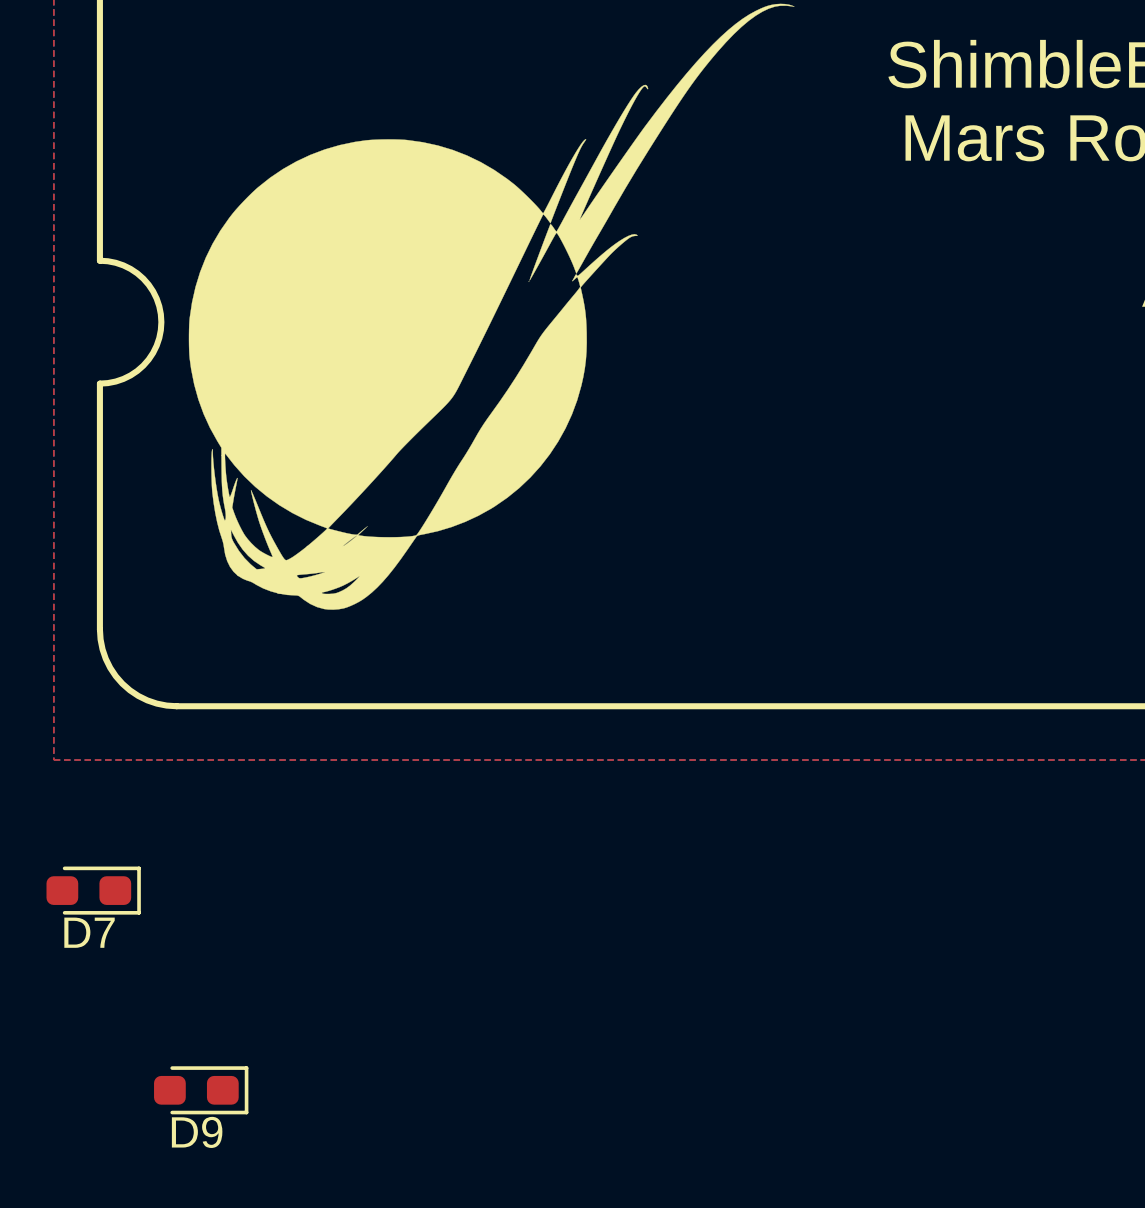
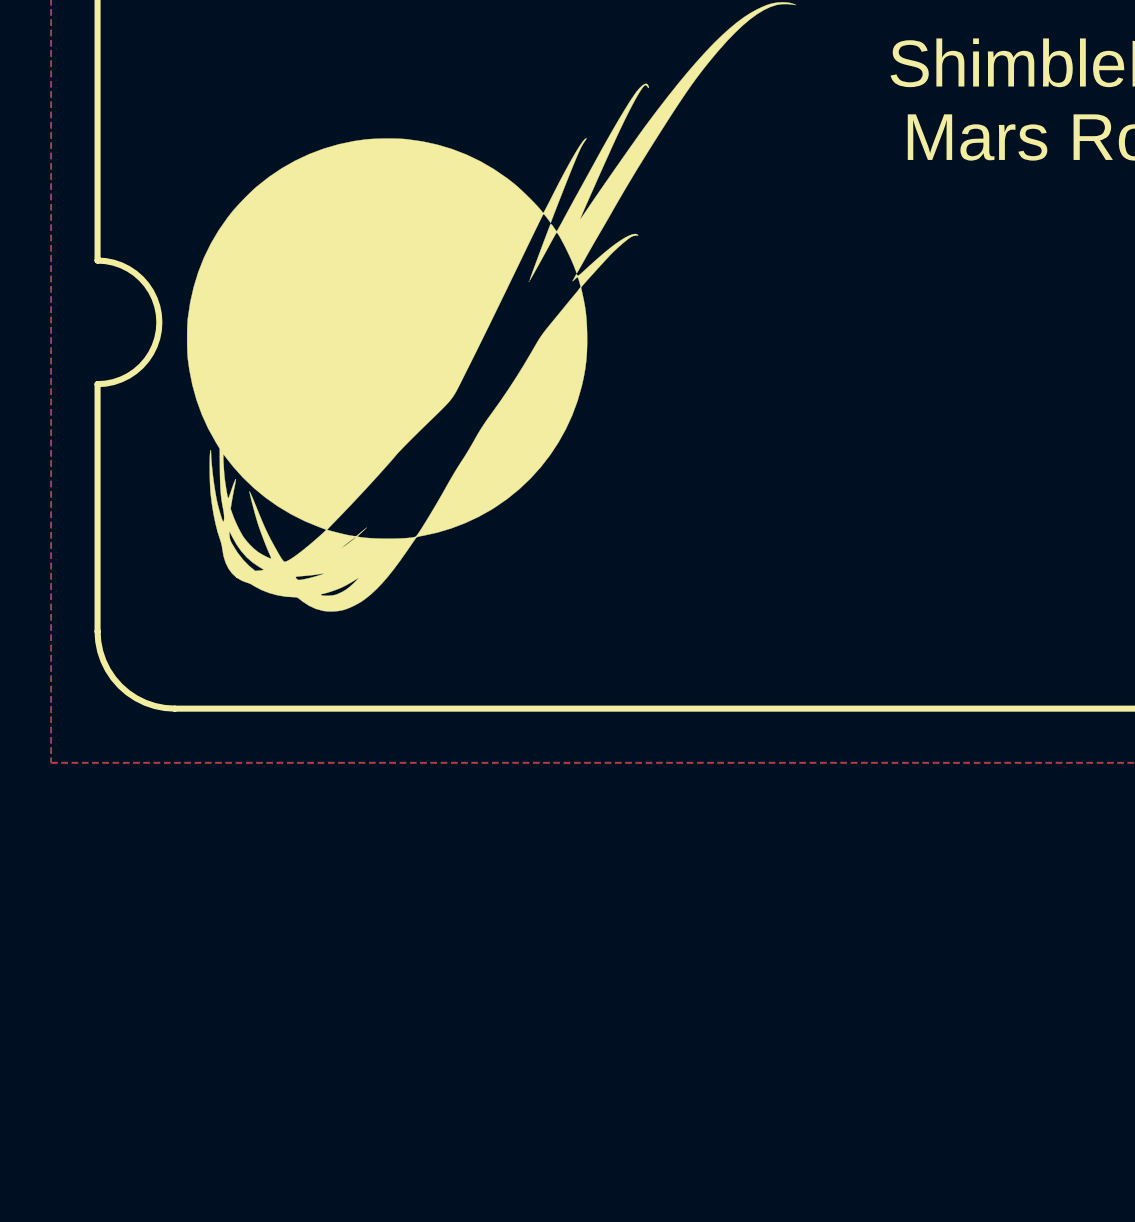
D7: (93, 890) -> none
D9: (201, 1090) -> none

